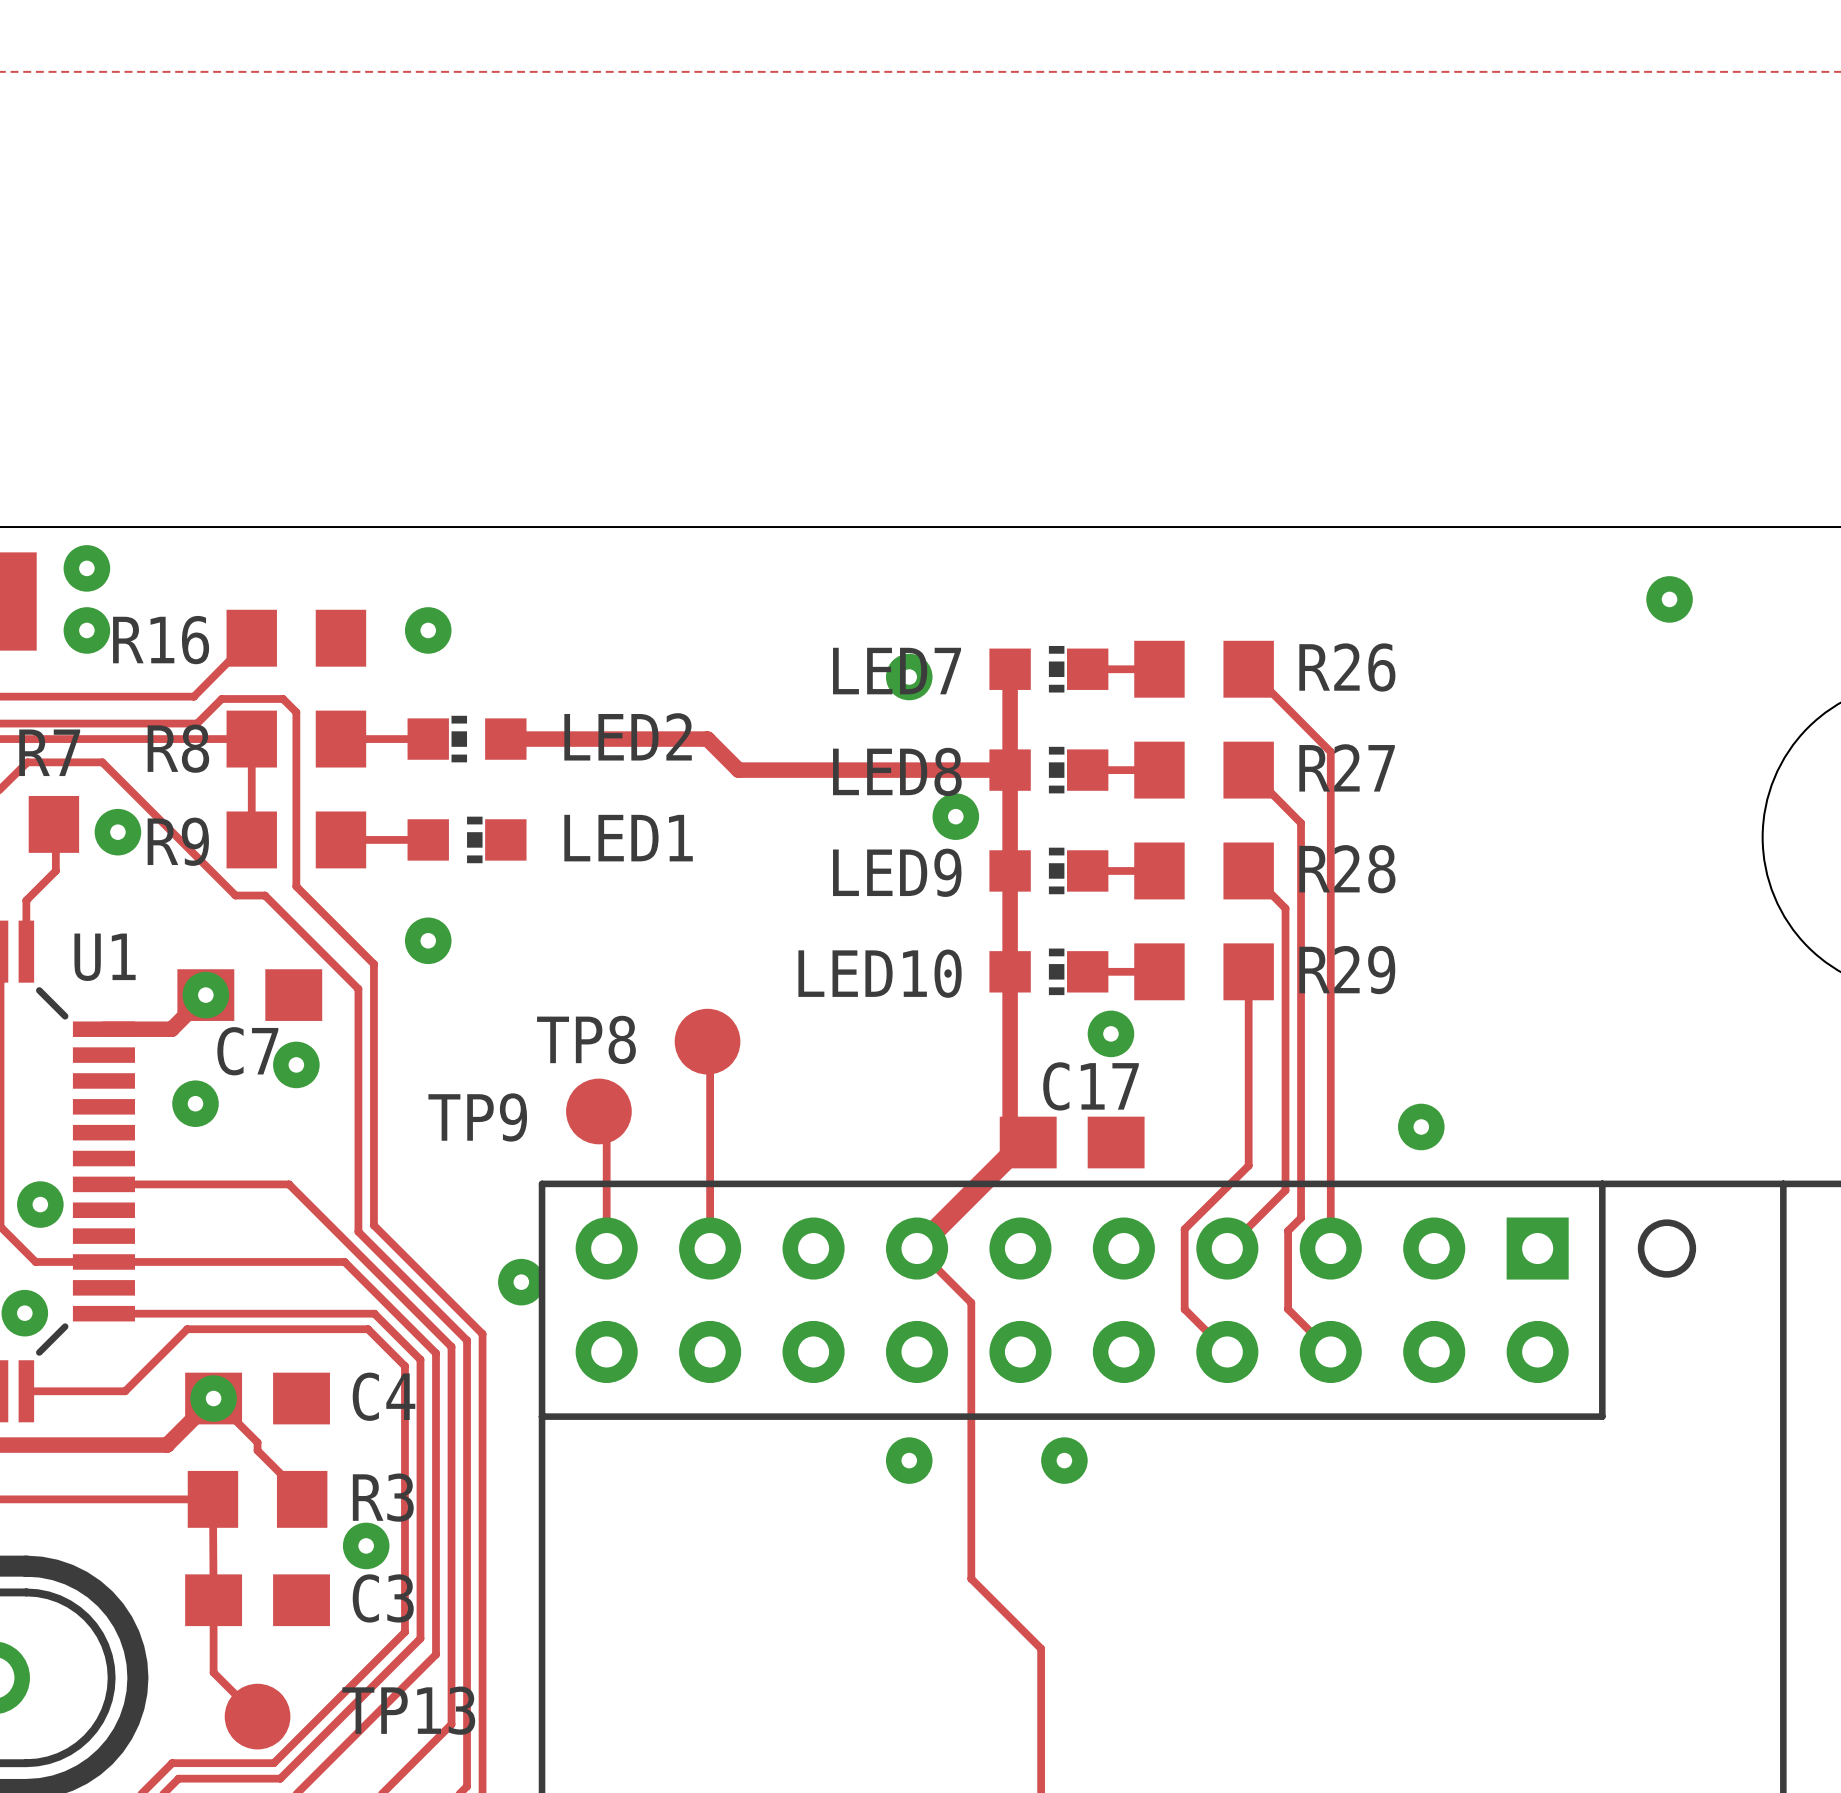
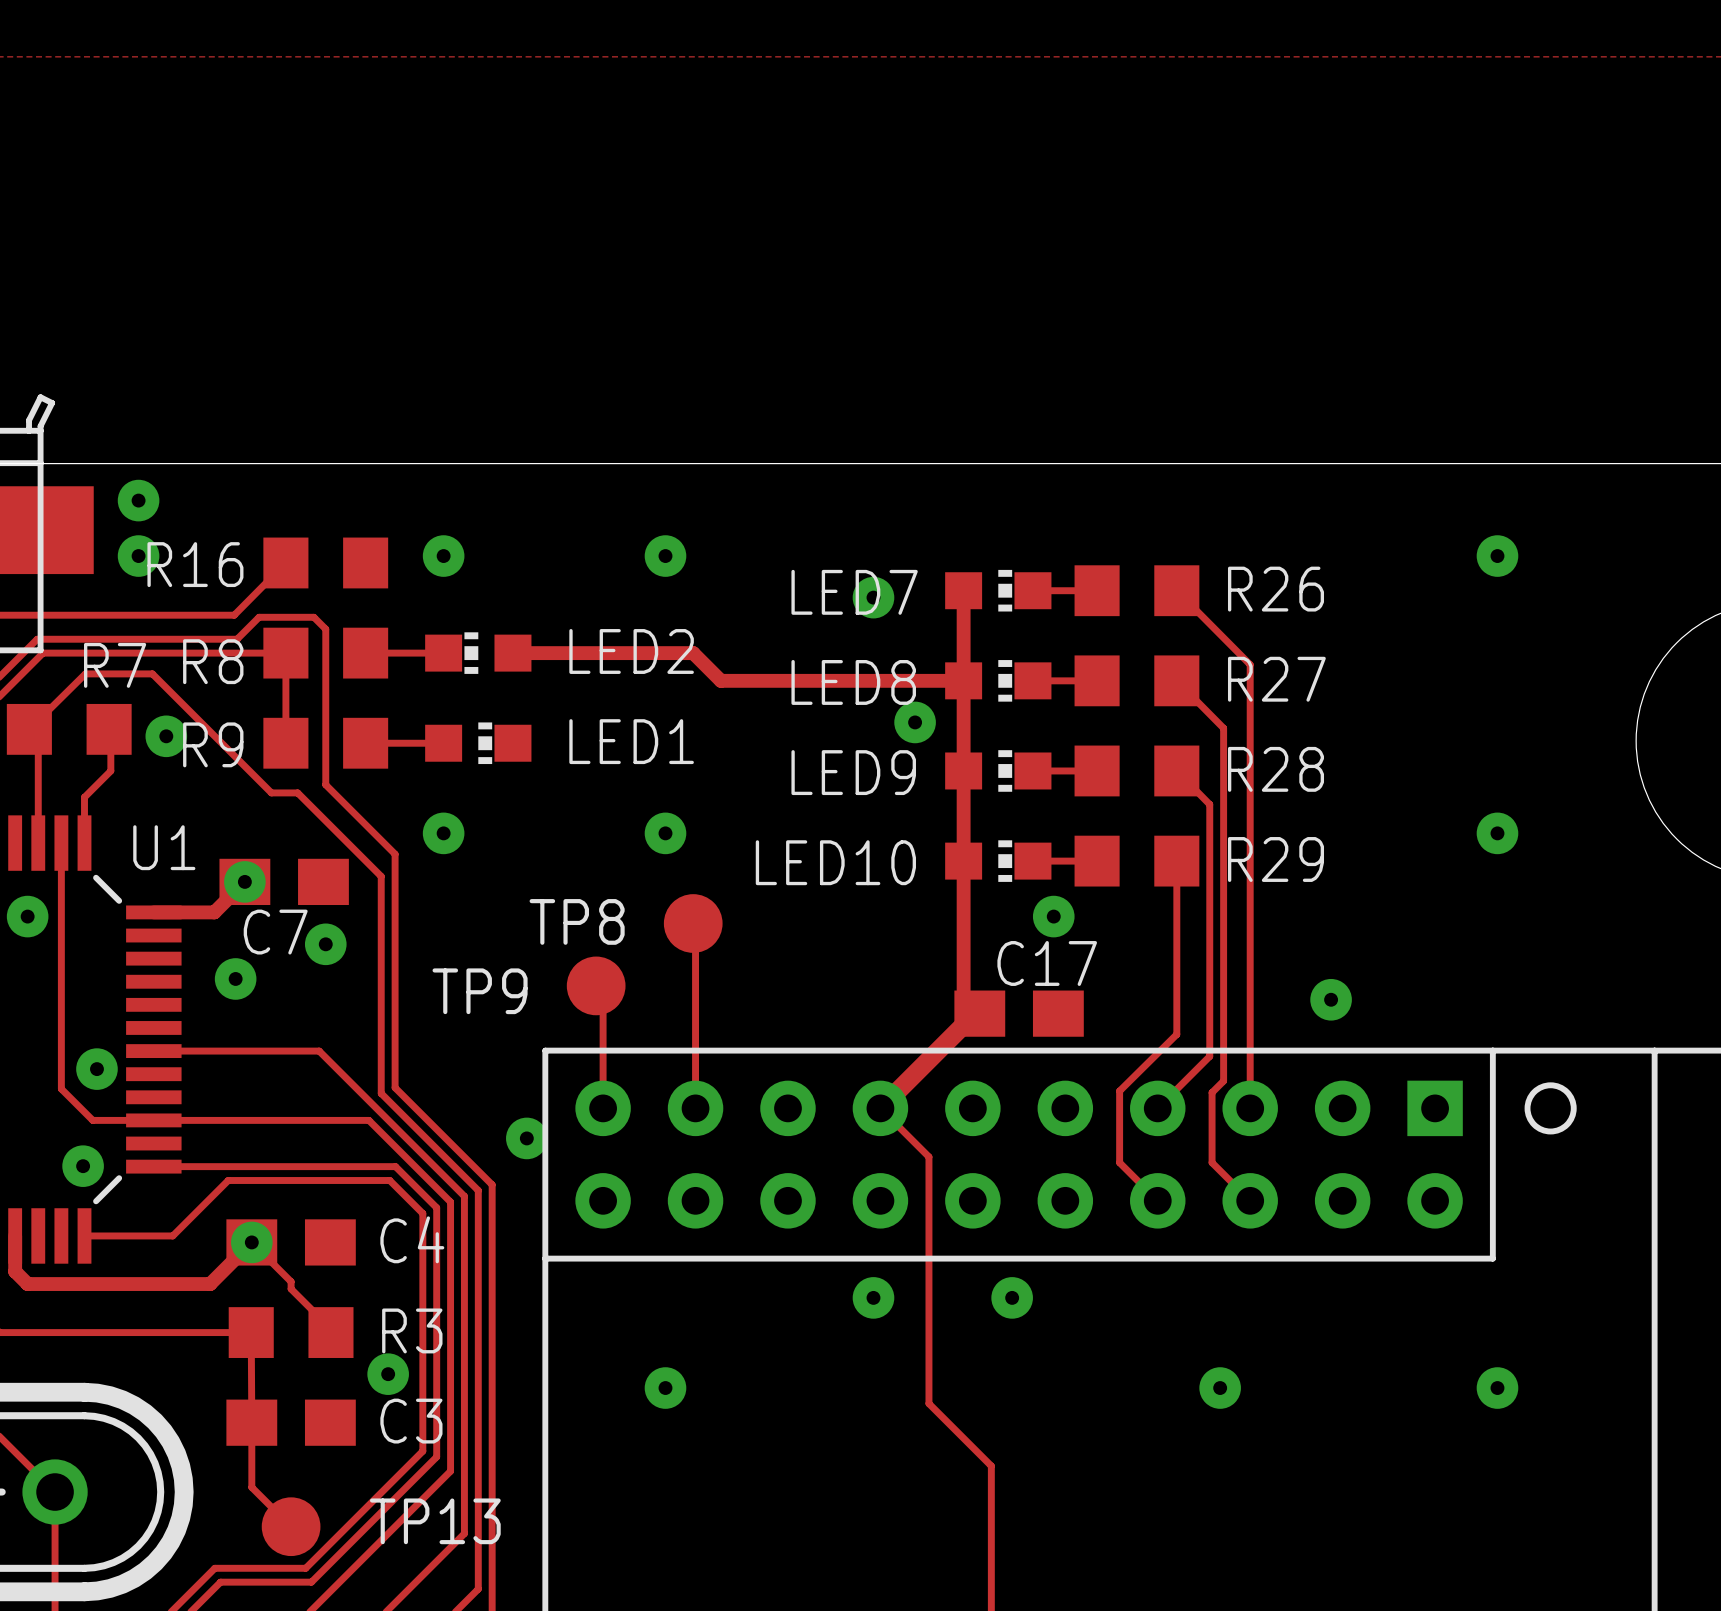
via position: (1669, 599) -> (1497, 556)
via: none -> (665, 556)
via: none -> (665, 833)
via: none -> (1497, 833)
via: none -> (665, 1388)
via: none -> (1220, 1388)
via: none -> (1497, 1388)

